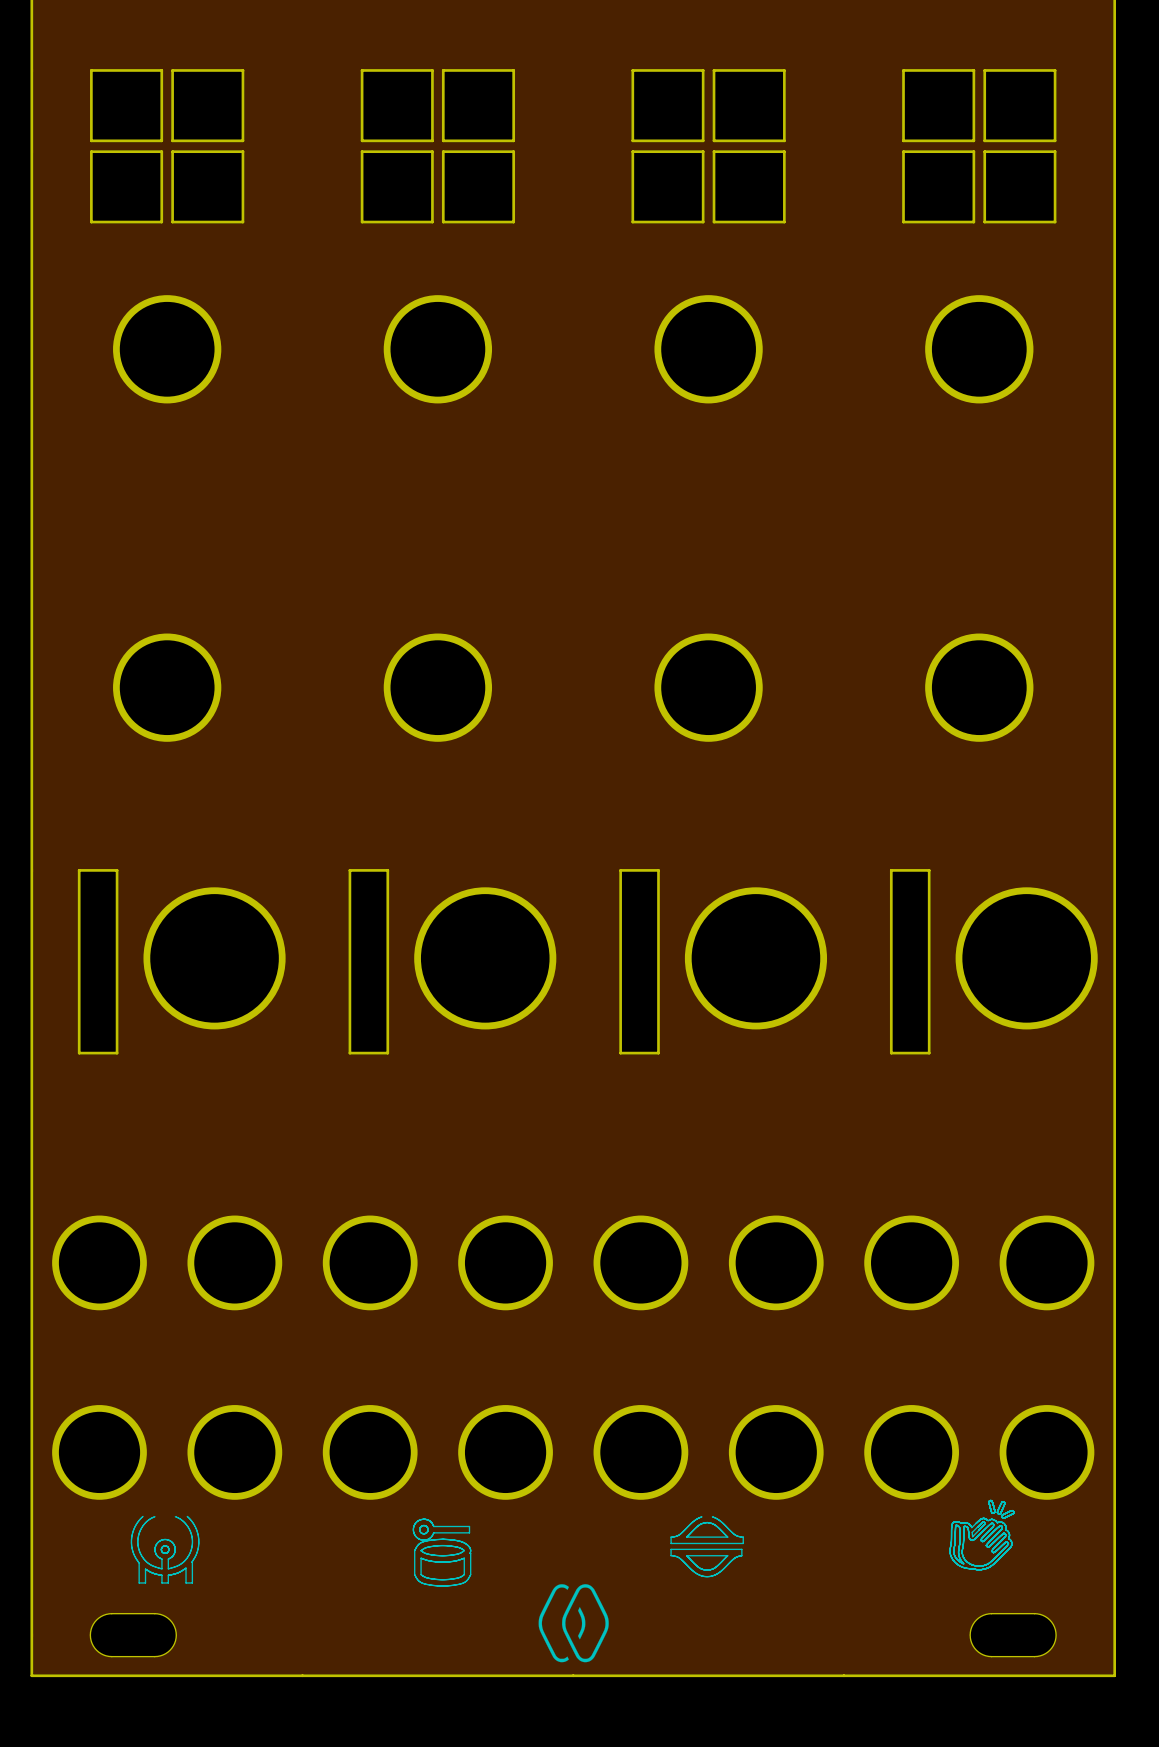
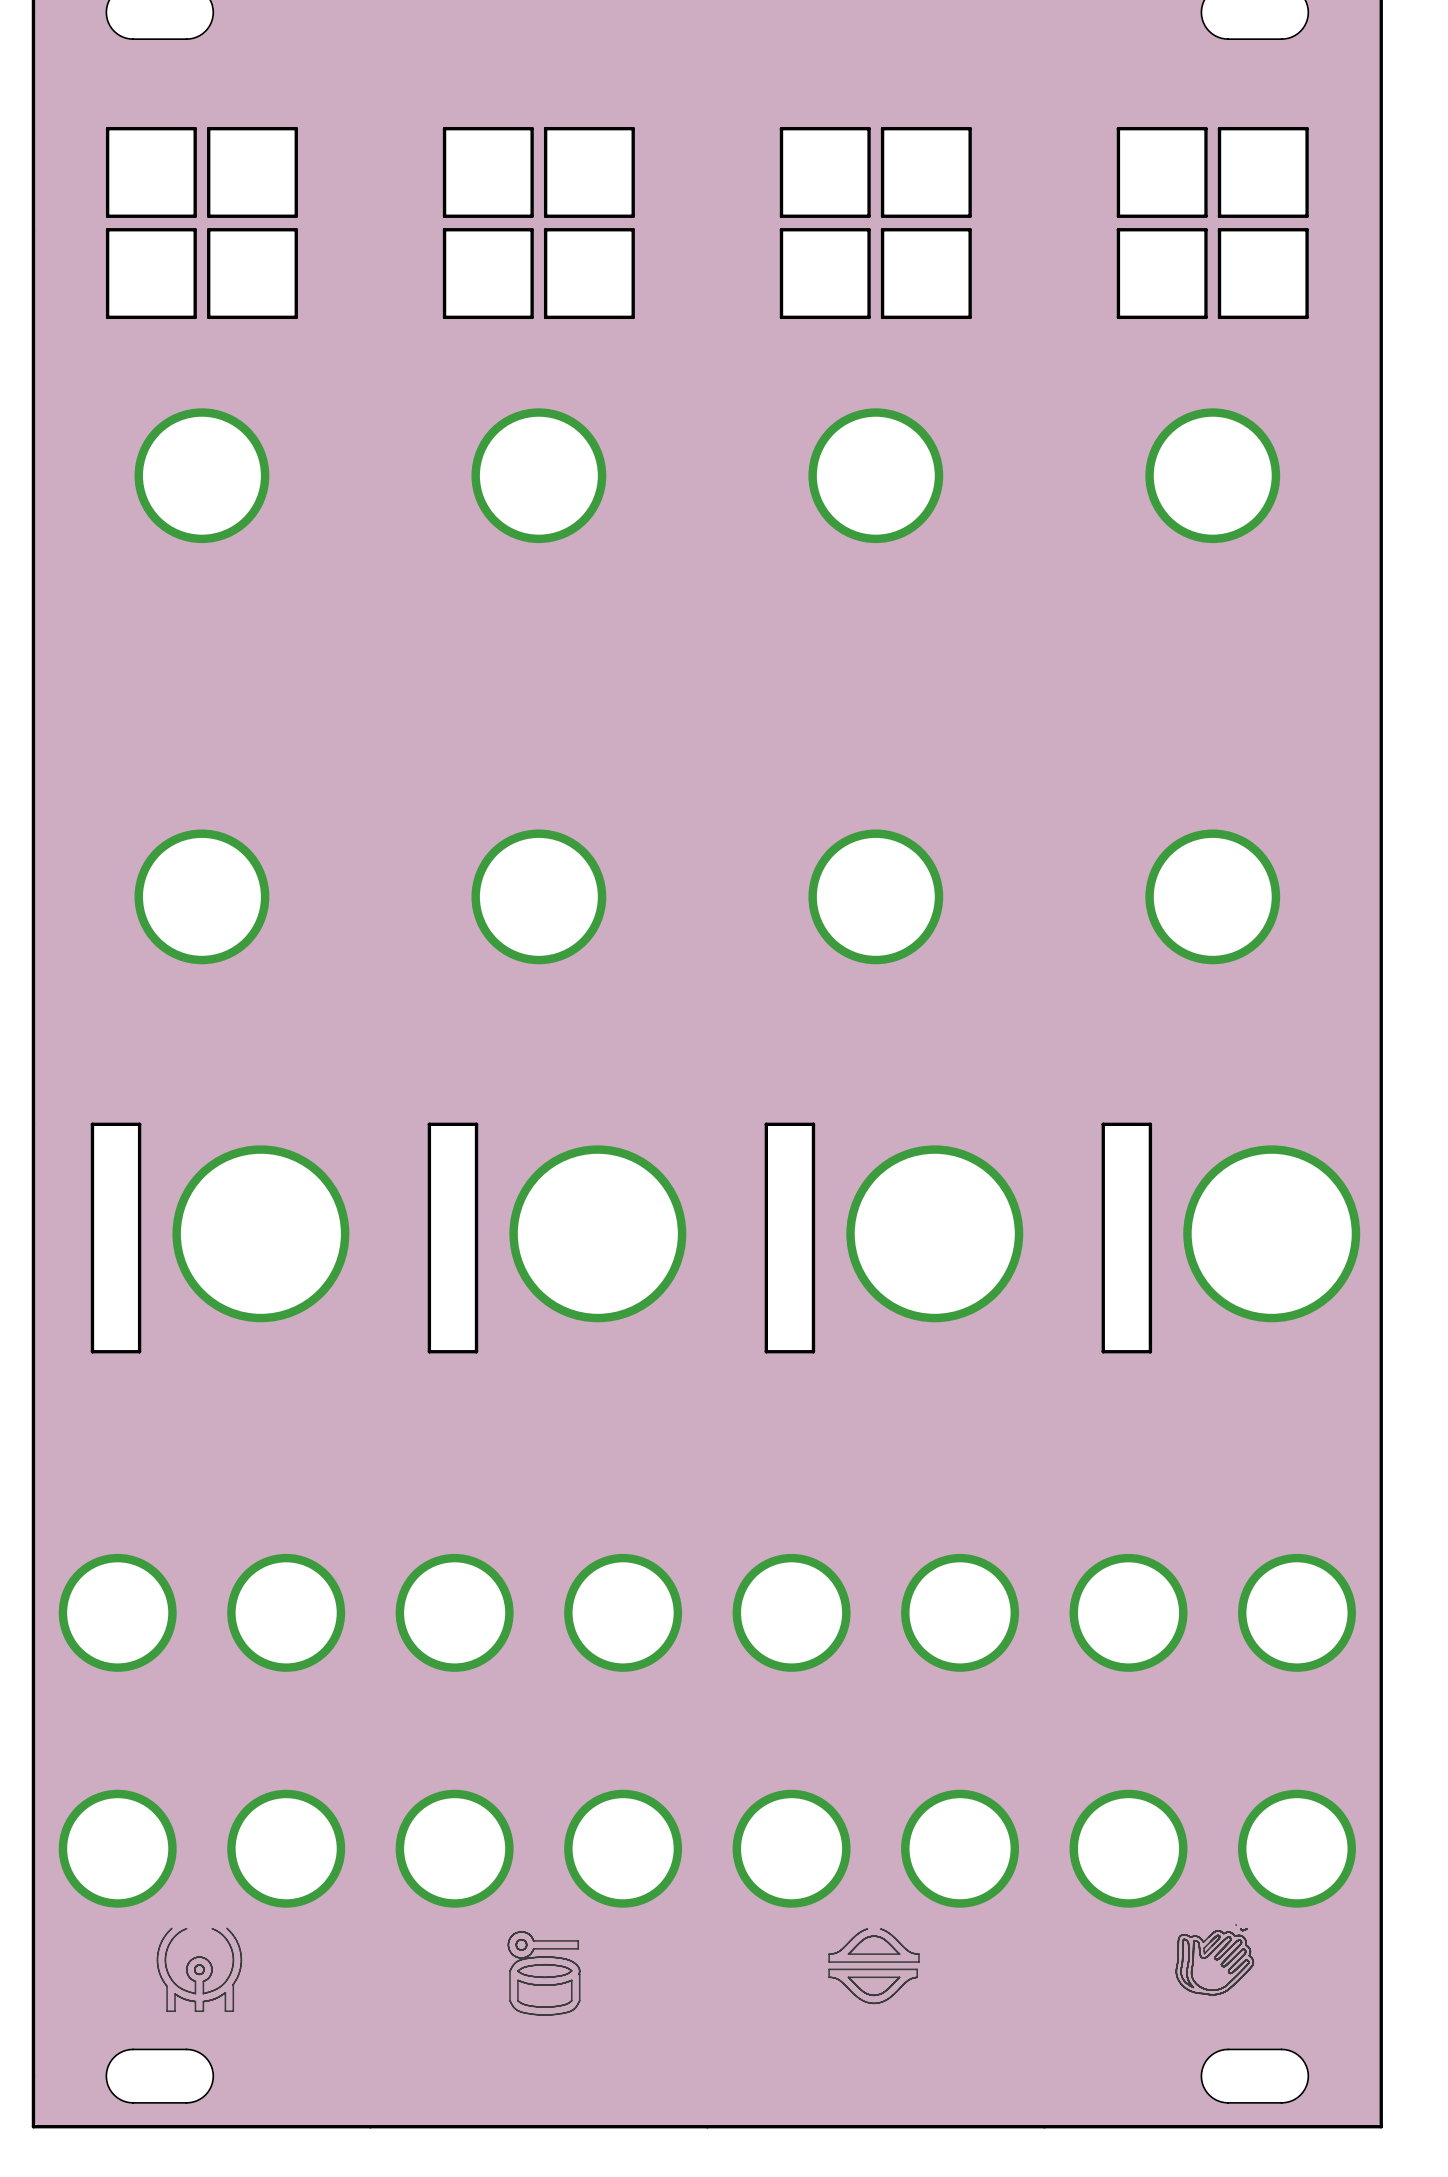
line: (993, 1506) (993, 1506) -> none
line: (991, 1512) (992, 1513) -> none
drawing: [538, 1584, 609, 1663] -> none

